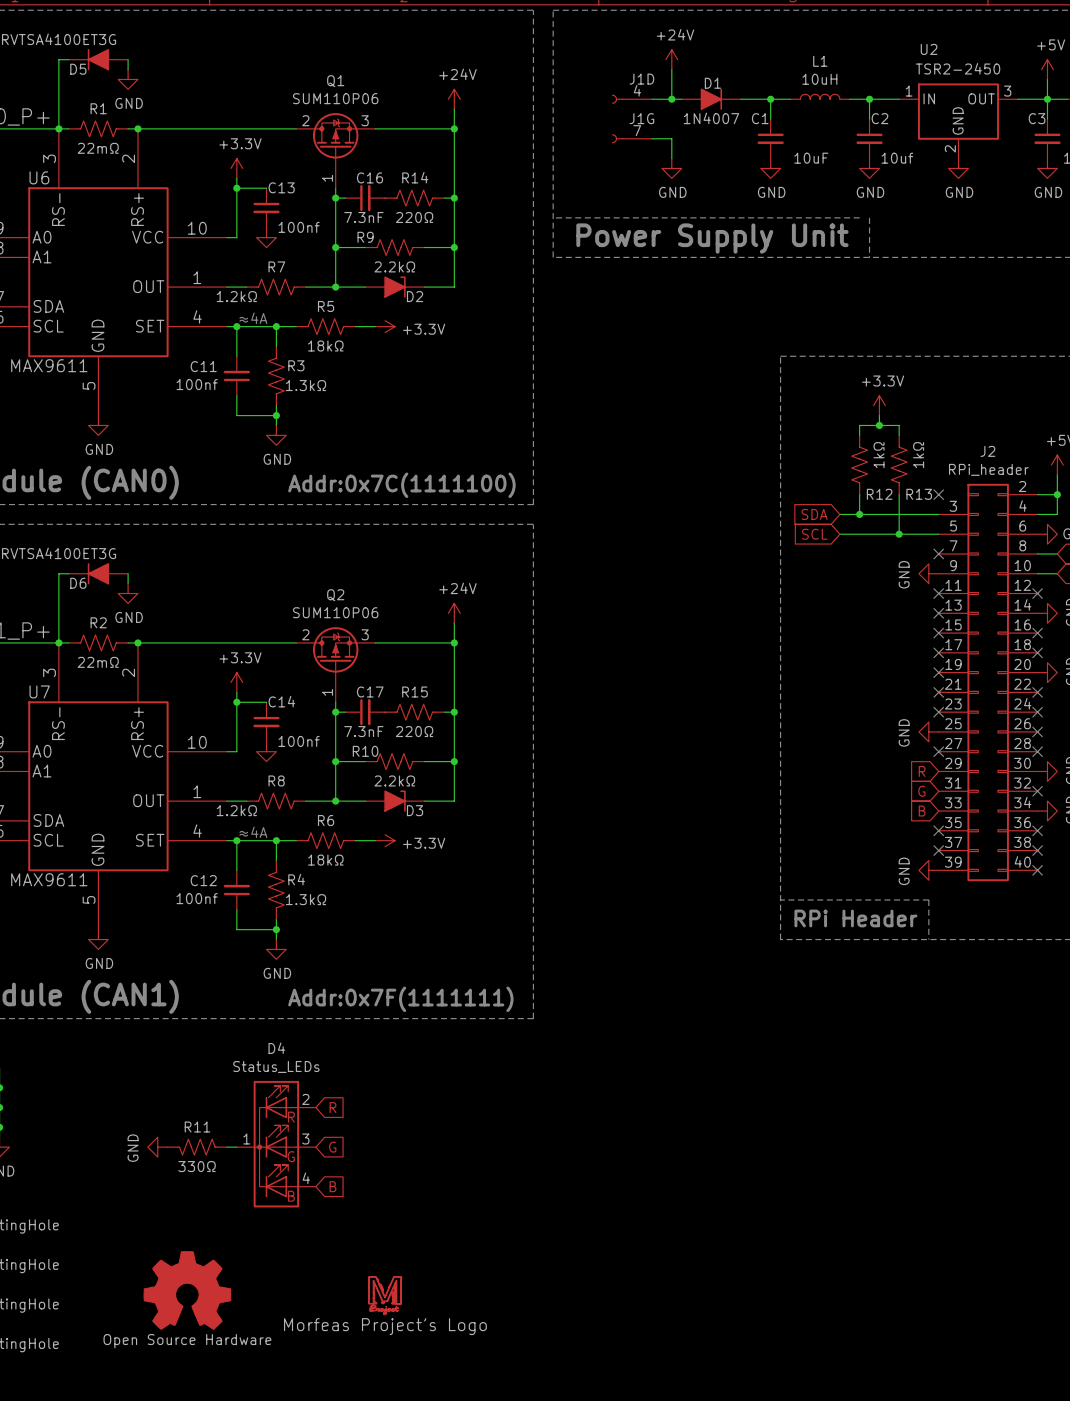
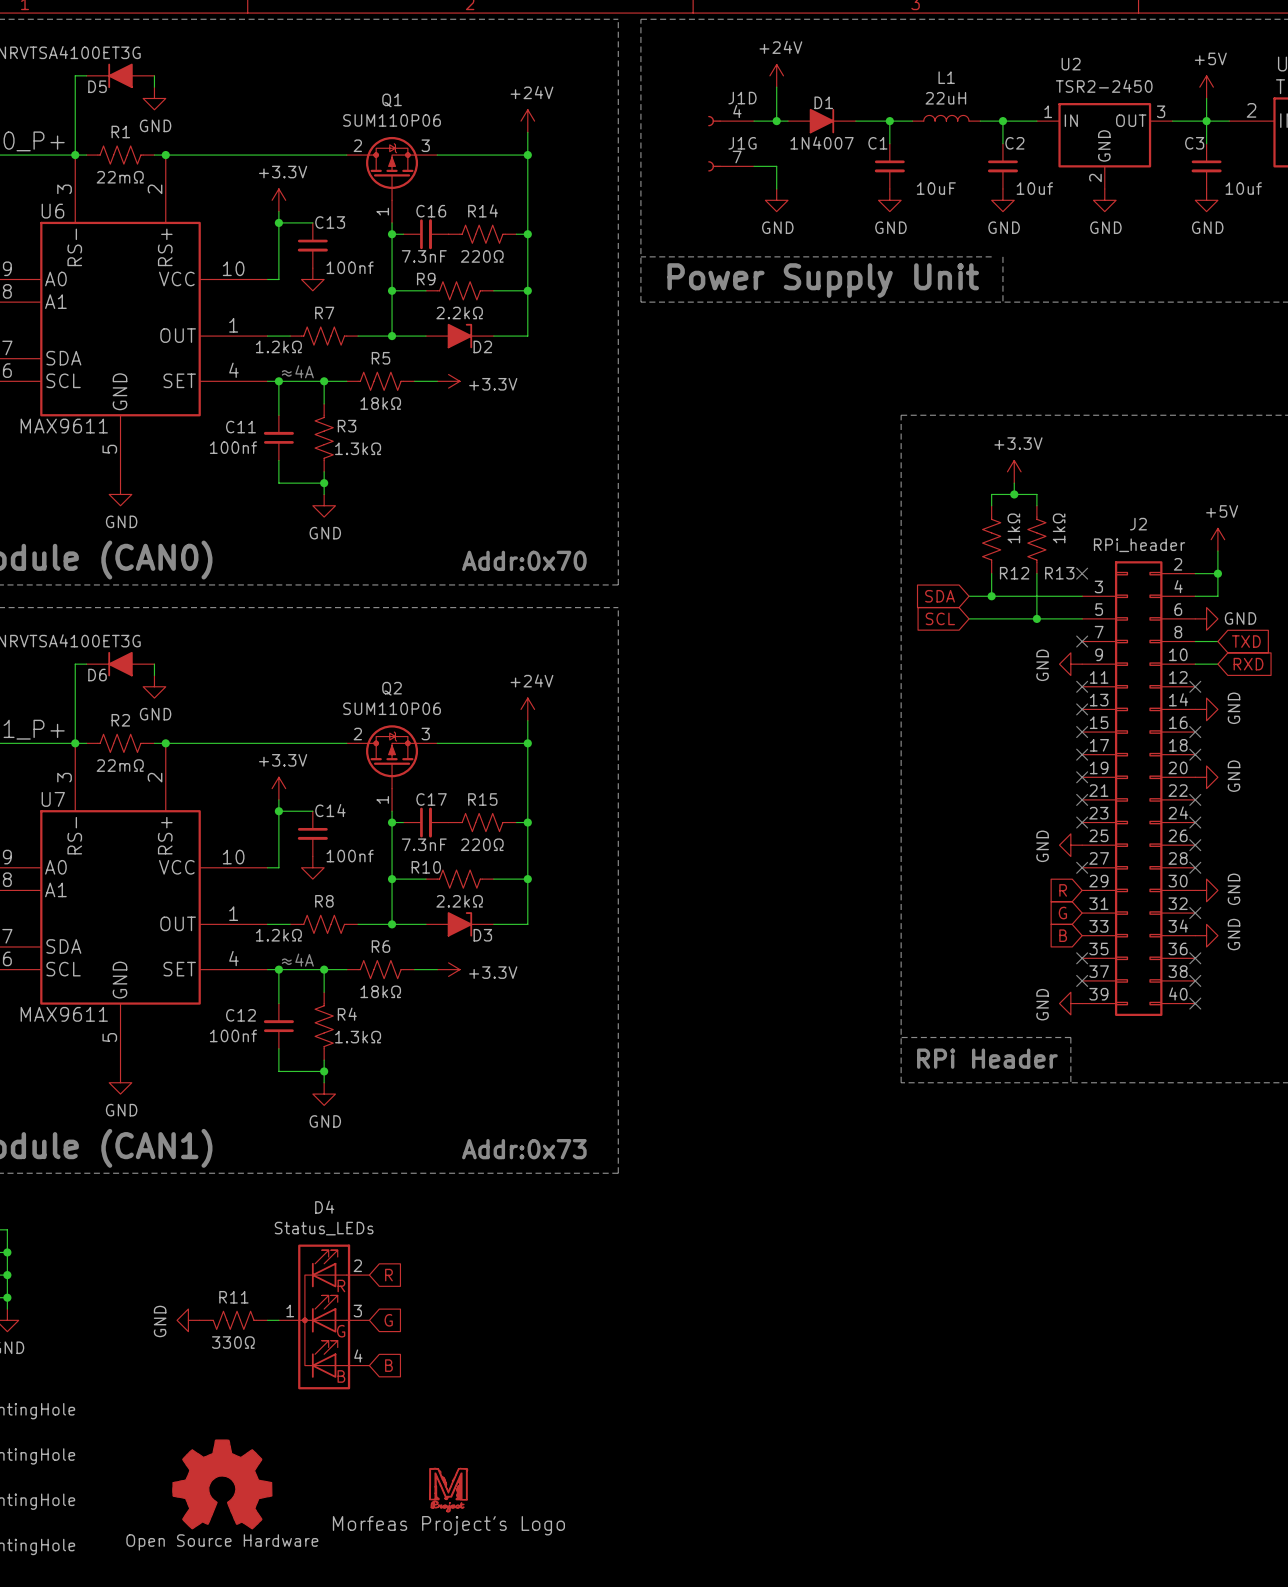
L1 value: 10uH (819, 79) -> 22uH (945, 98)
text: Addr:0x7C(1111100) (401, 485) -> Addr:0x70 (524, 560)
text: none -> Addr:0x73 (524, 1149)
text: Addr:0x7F(1111111) (400, 999) -> none

